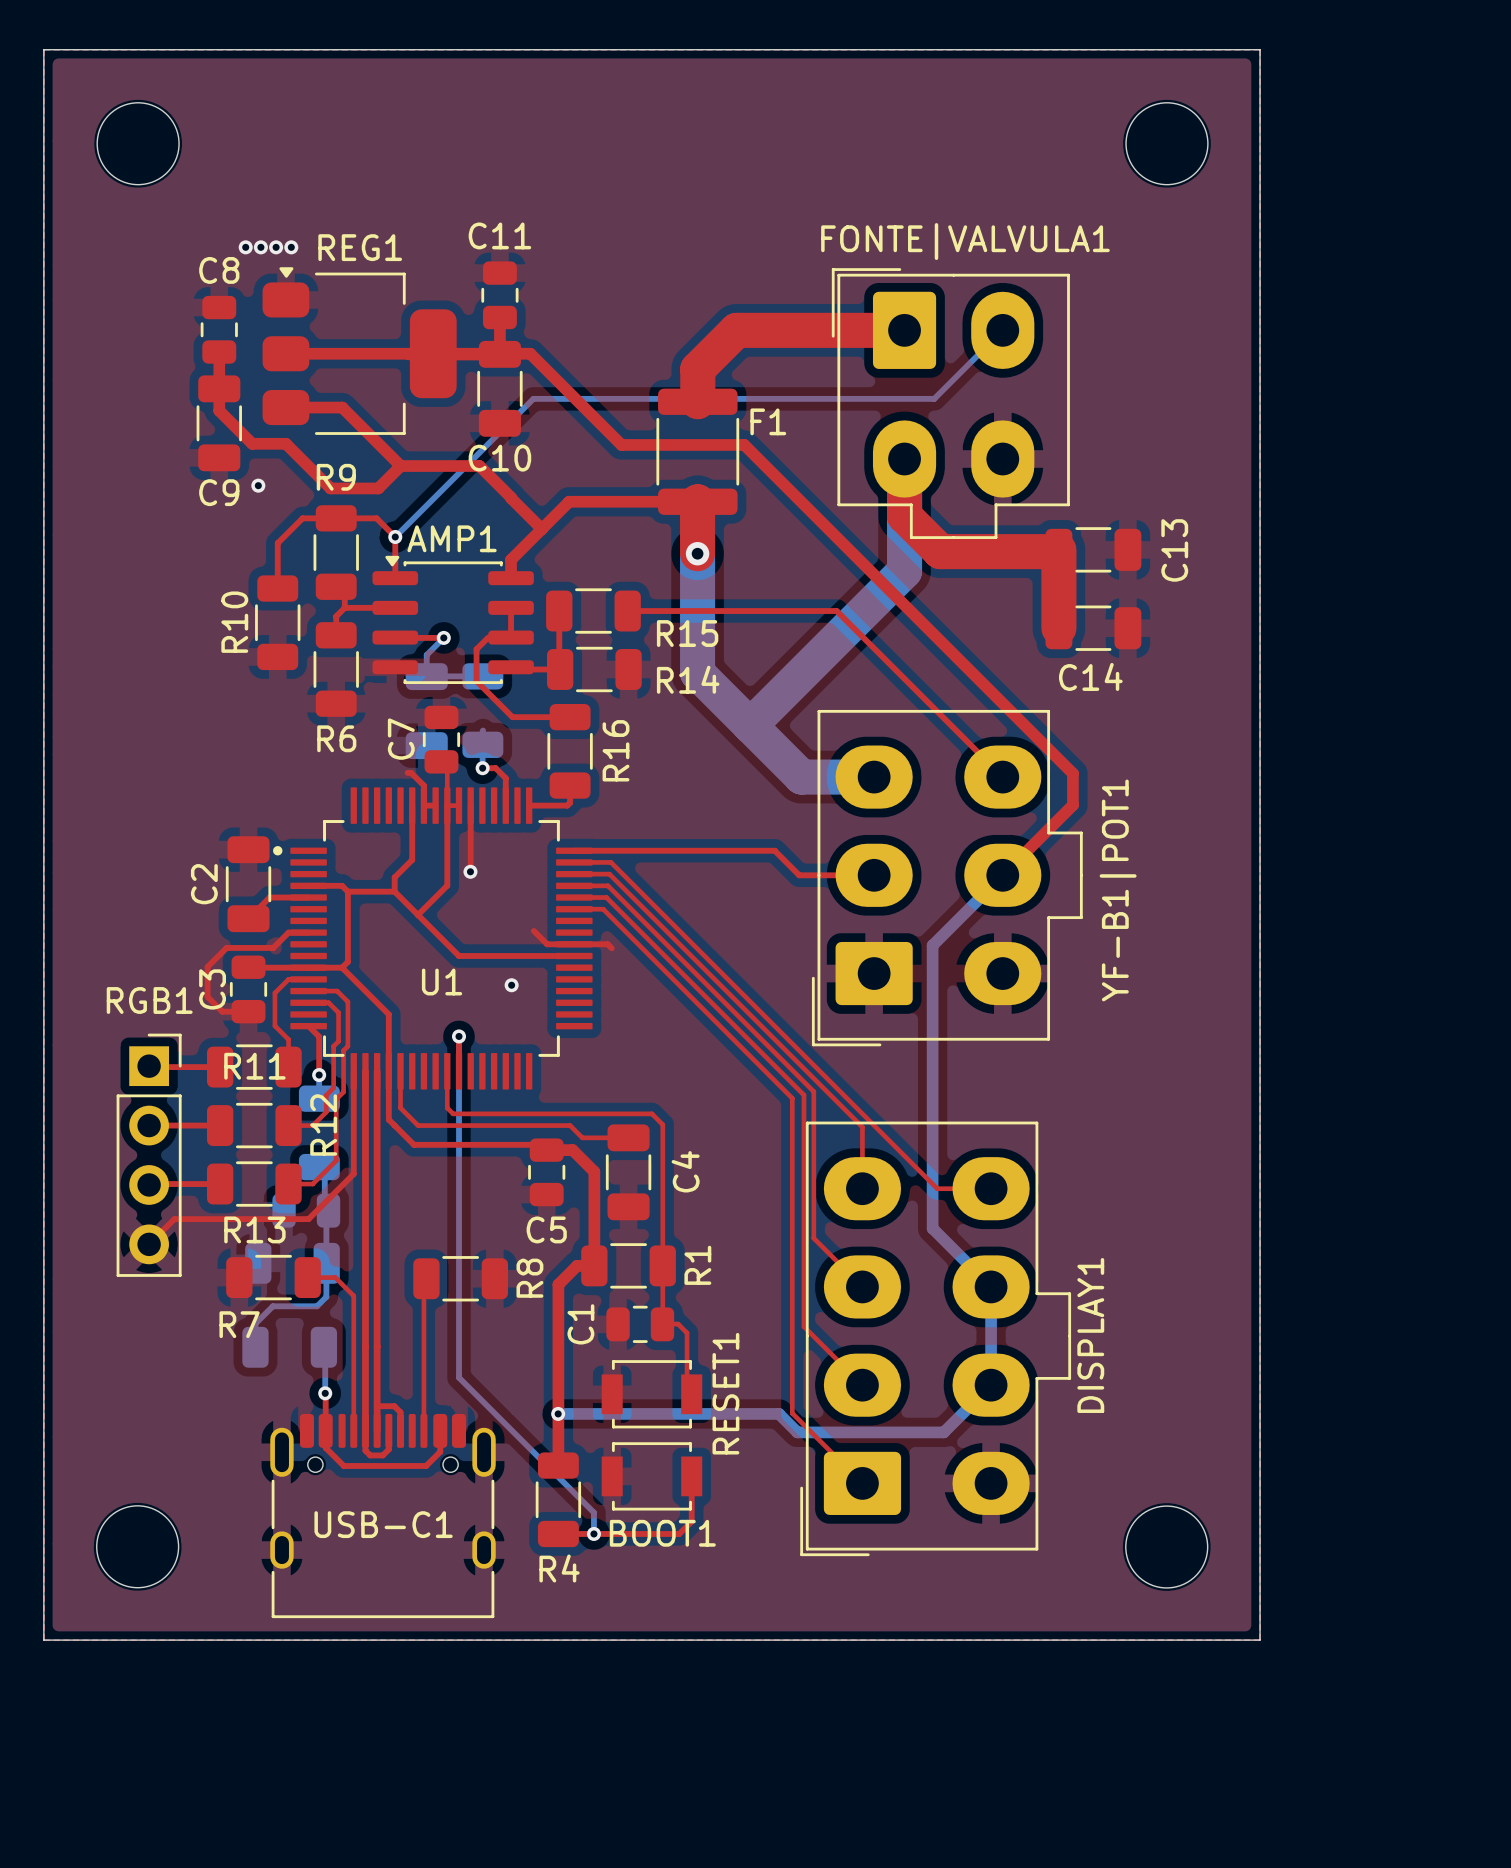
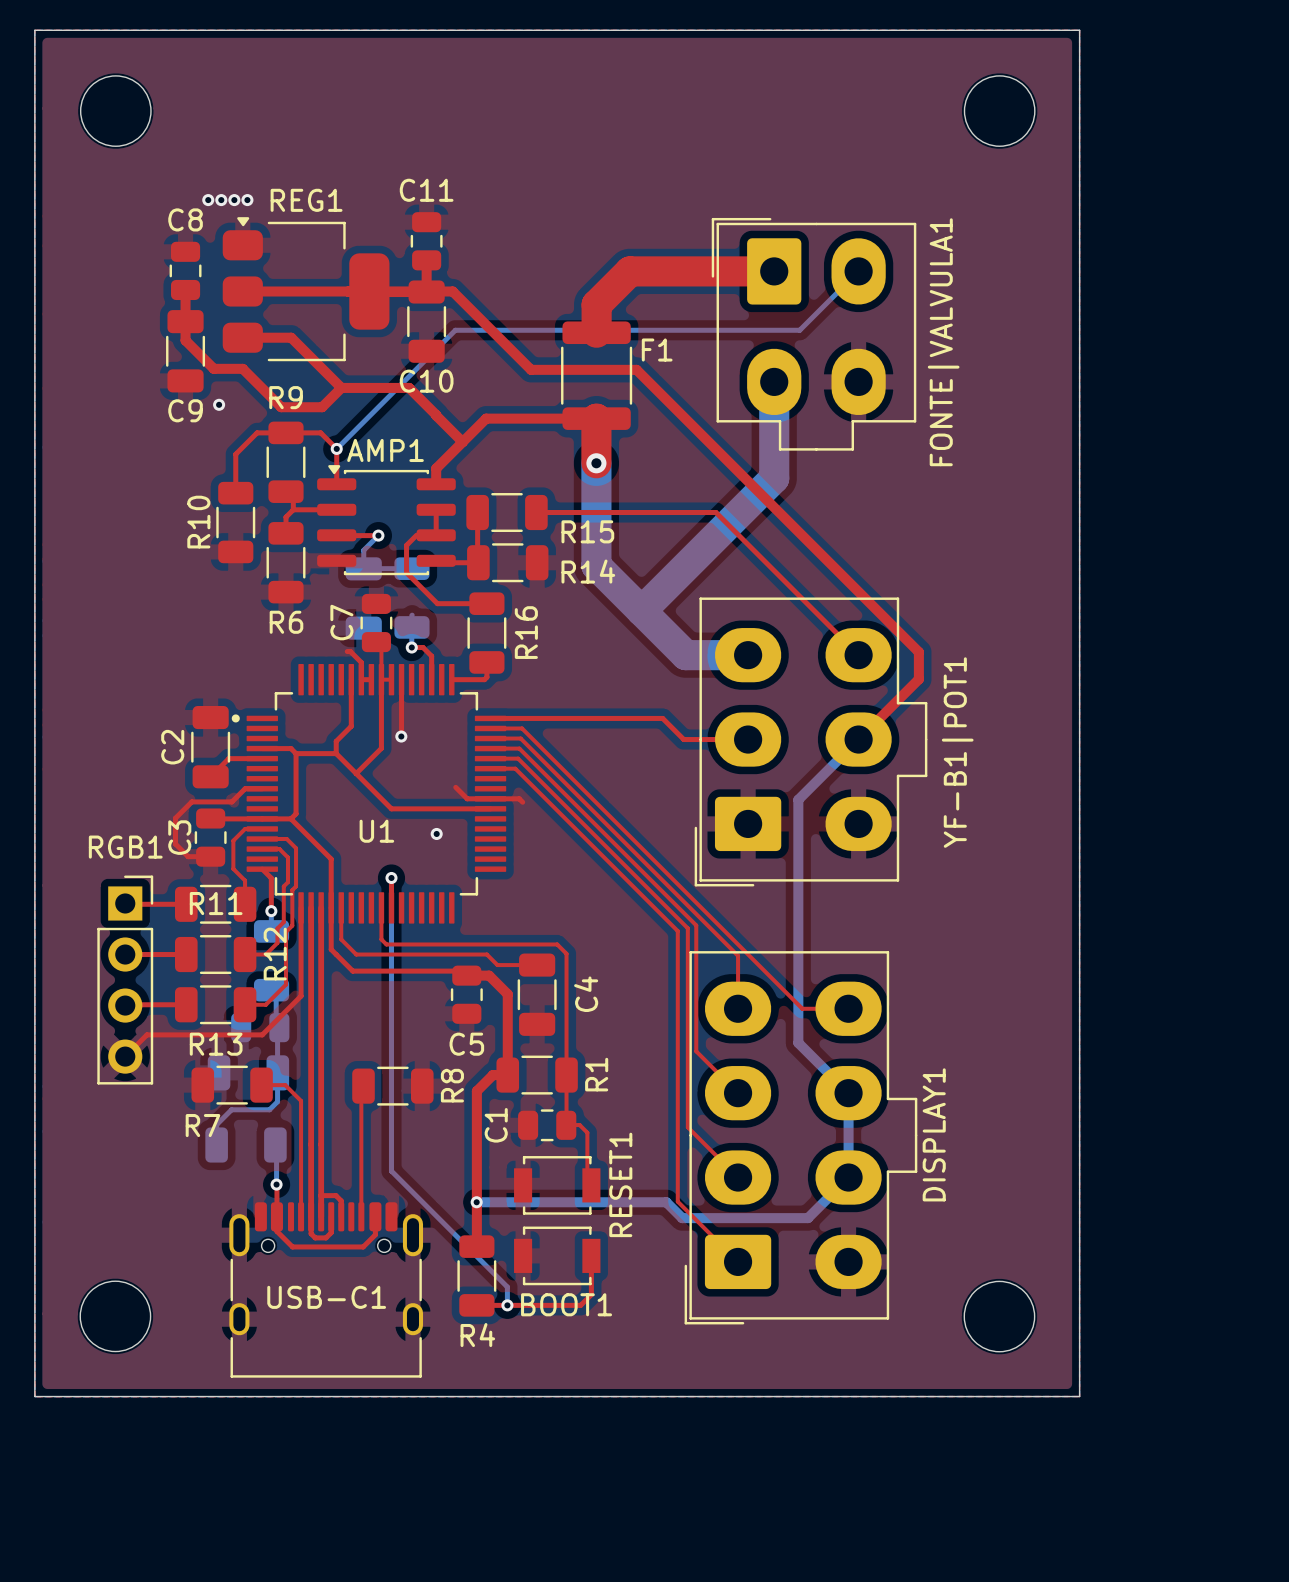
FONTE|VALVULA1 name rotation: 0° (965, 241) -> 90° counterclockwise (943, 342)
top track: (904, 459) (904, 515) (940, 551) (1057, 551) (1058, 549) (1058, 628) -> none
C13: (1093, 549) -> none
C14: (1093, 628) -> none

